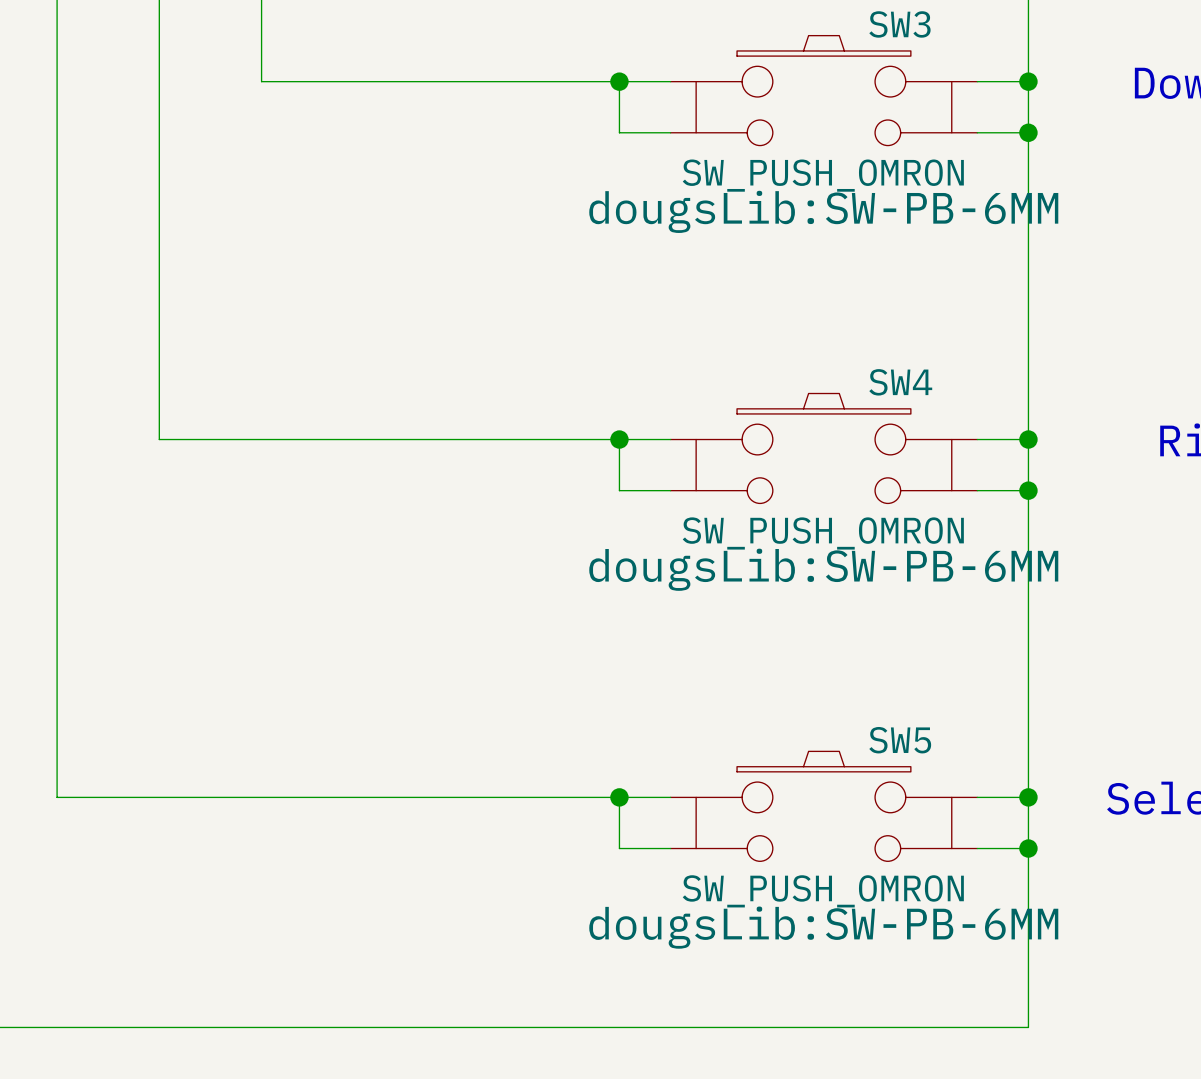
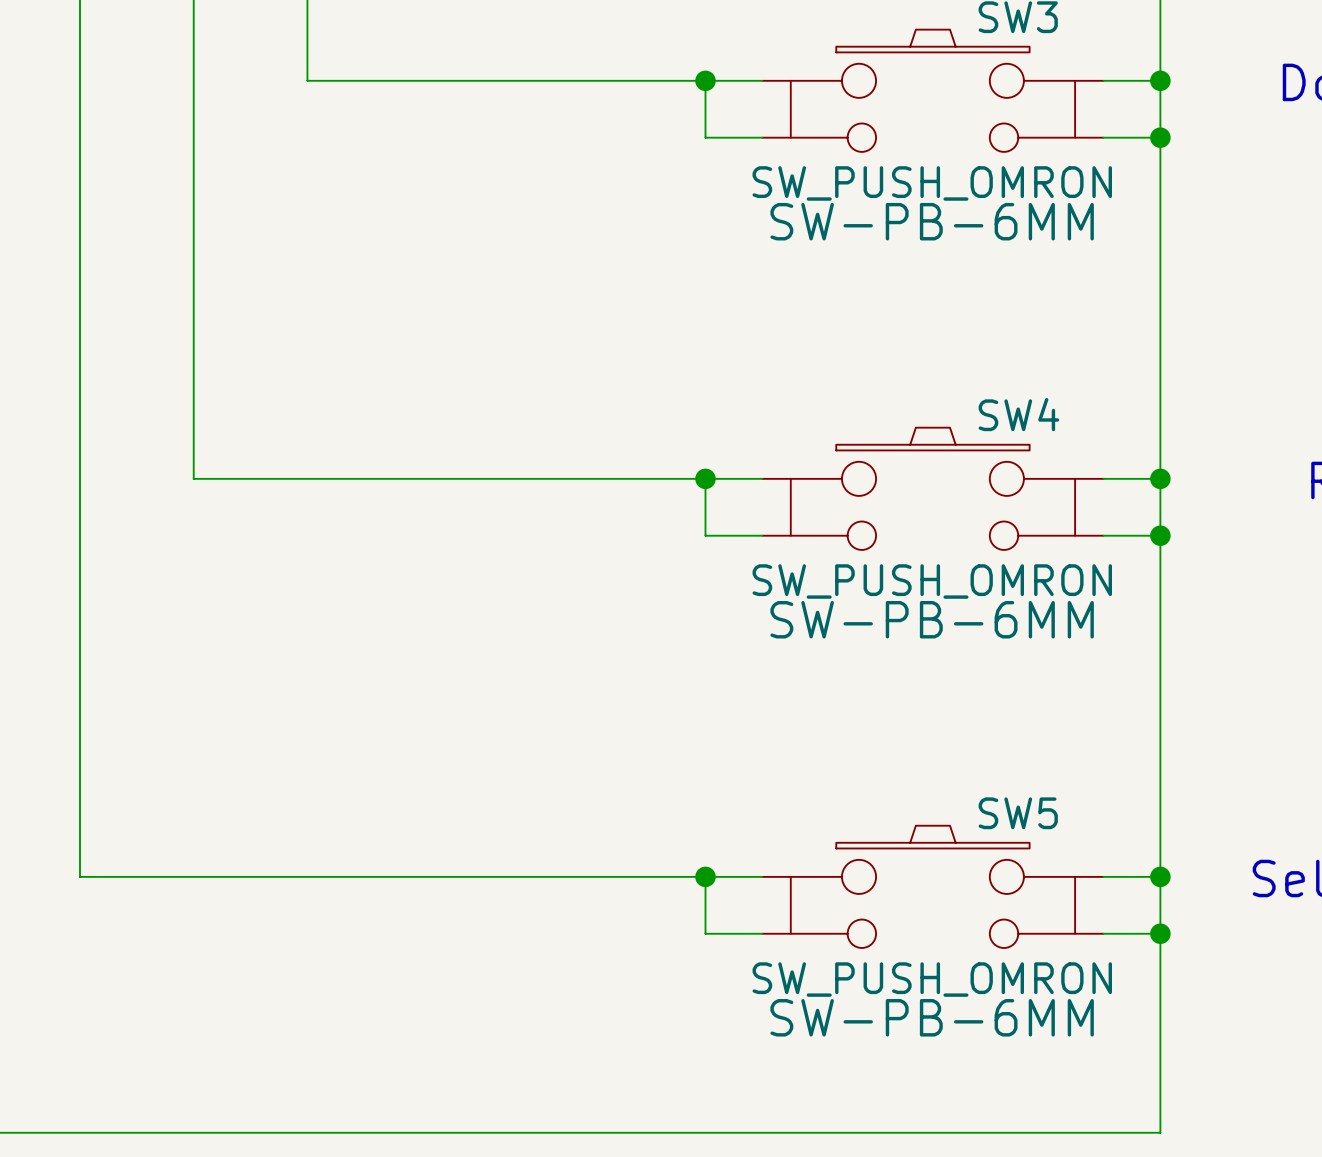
SW3 text: dougsLib:SW-PB-6MM (823, 211) -> SW-PB-6MM (932, 221)
SW4 text: dougsLib:SW-PB-6MM (823, 569) -> SW-PB-6MM (932, 619)
SW5 text: dougsLib:SW-PB-6MM (823, 927) -> SW-PB-6MM (932, 1017)

